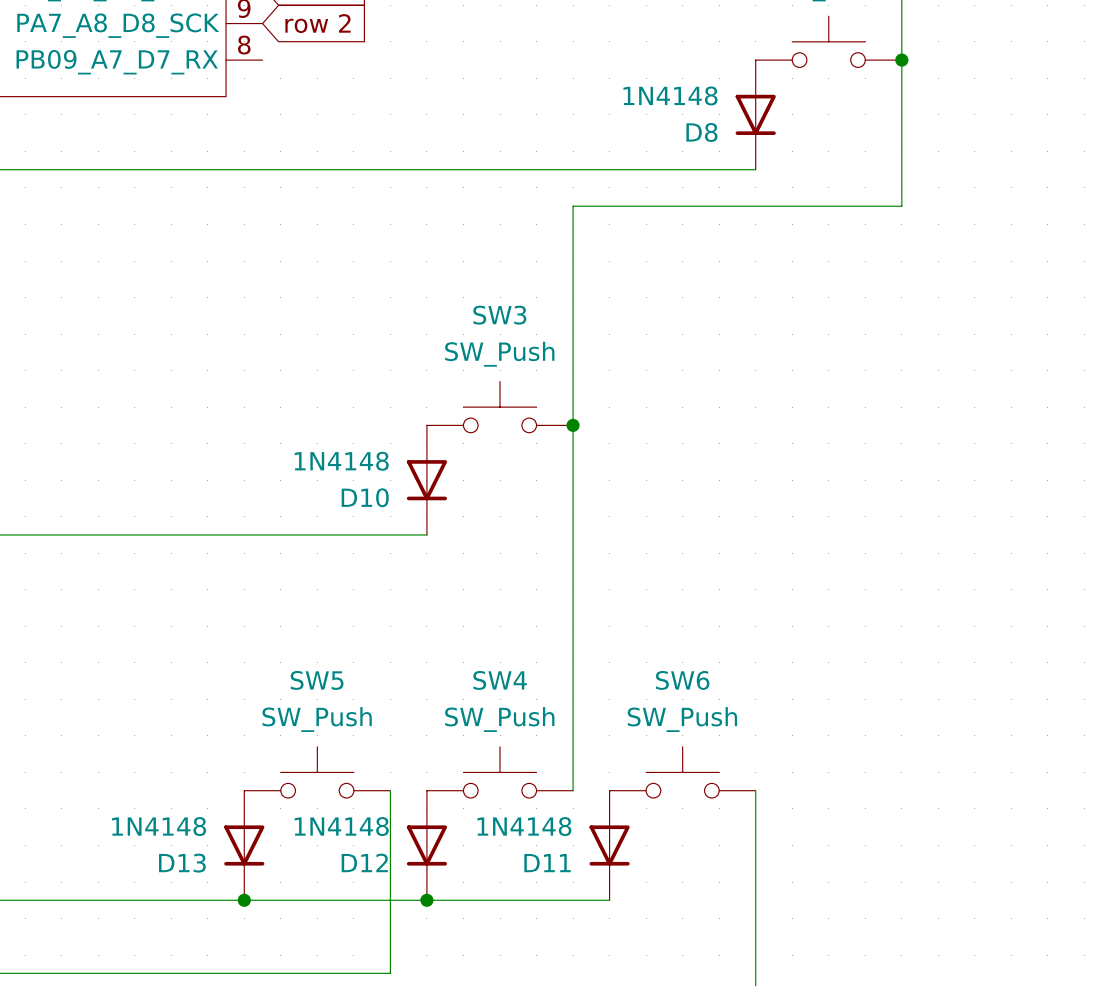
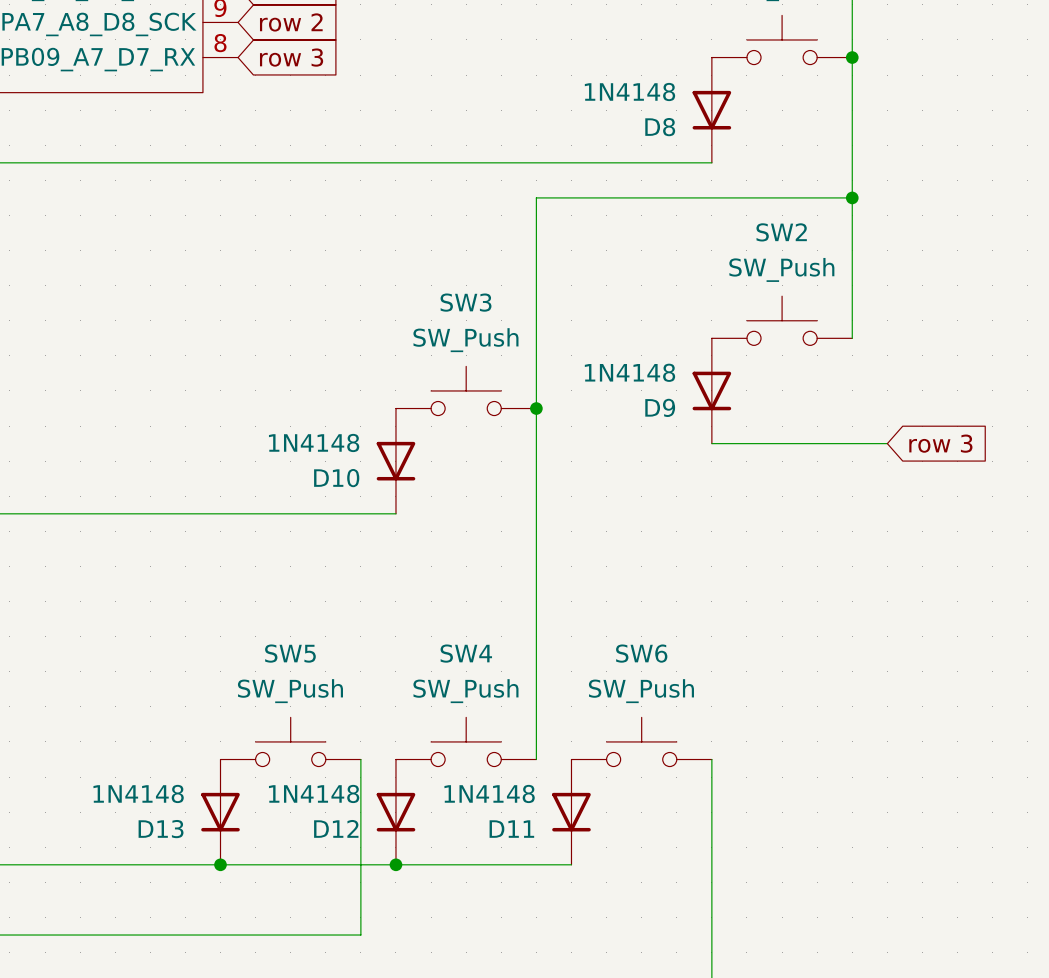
global label: none -> row 3 (291, 57)
wire: none -> (852, 197) (852, 338)
junction: none -> (852, 197)
SW2: none -> SW_Push (782, 320)
D9: none -> 1N4148 (711, 390)
wire: none -> (711, 443) (887, 443)
global label: none -> row 3 (940, 443)

